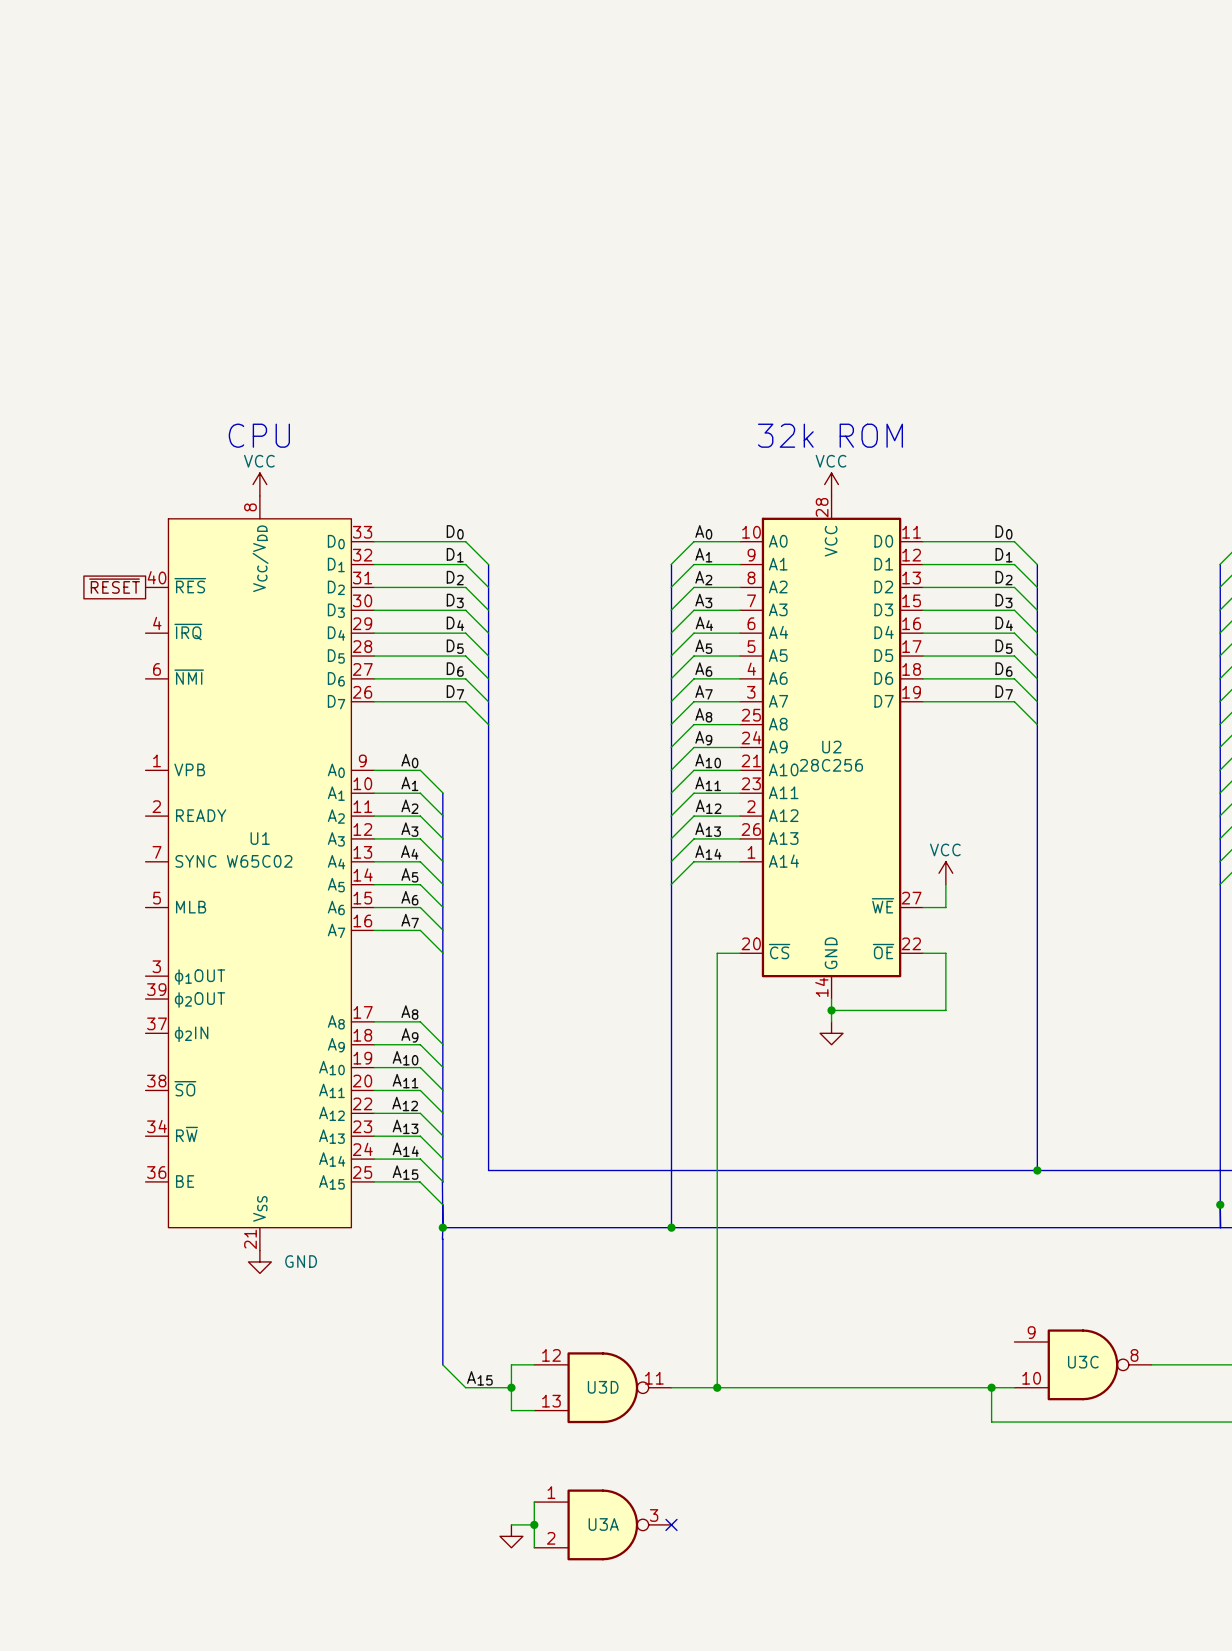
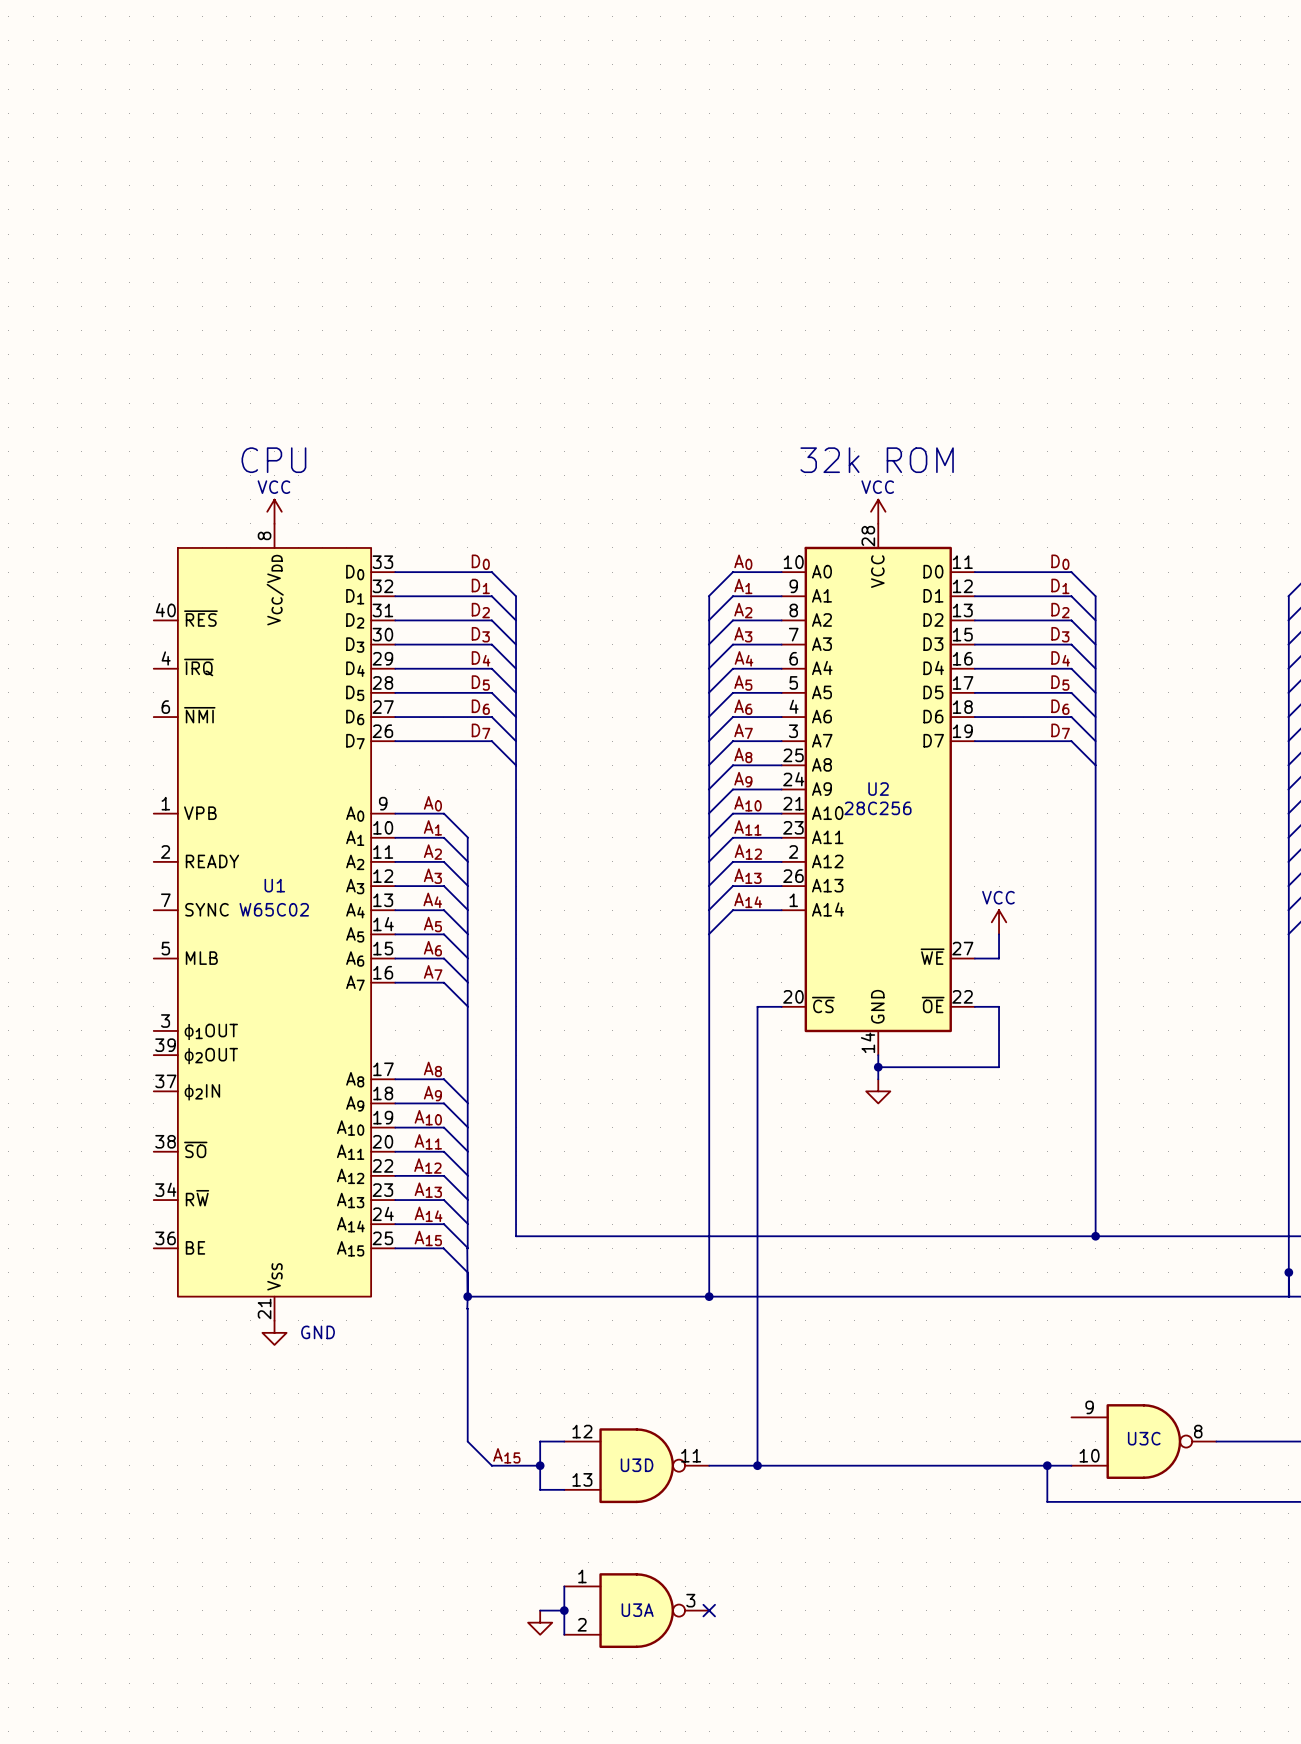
global label: ~{RESET} (114, 586) -> none

